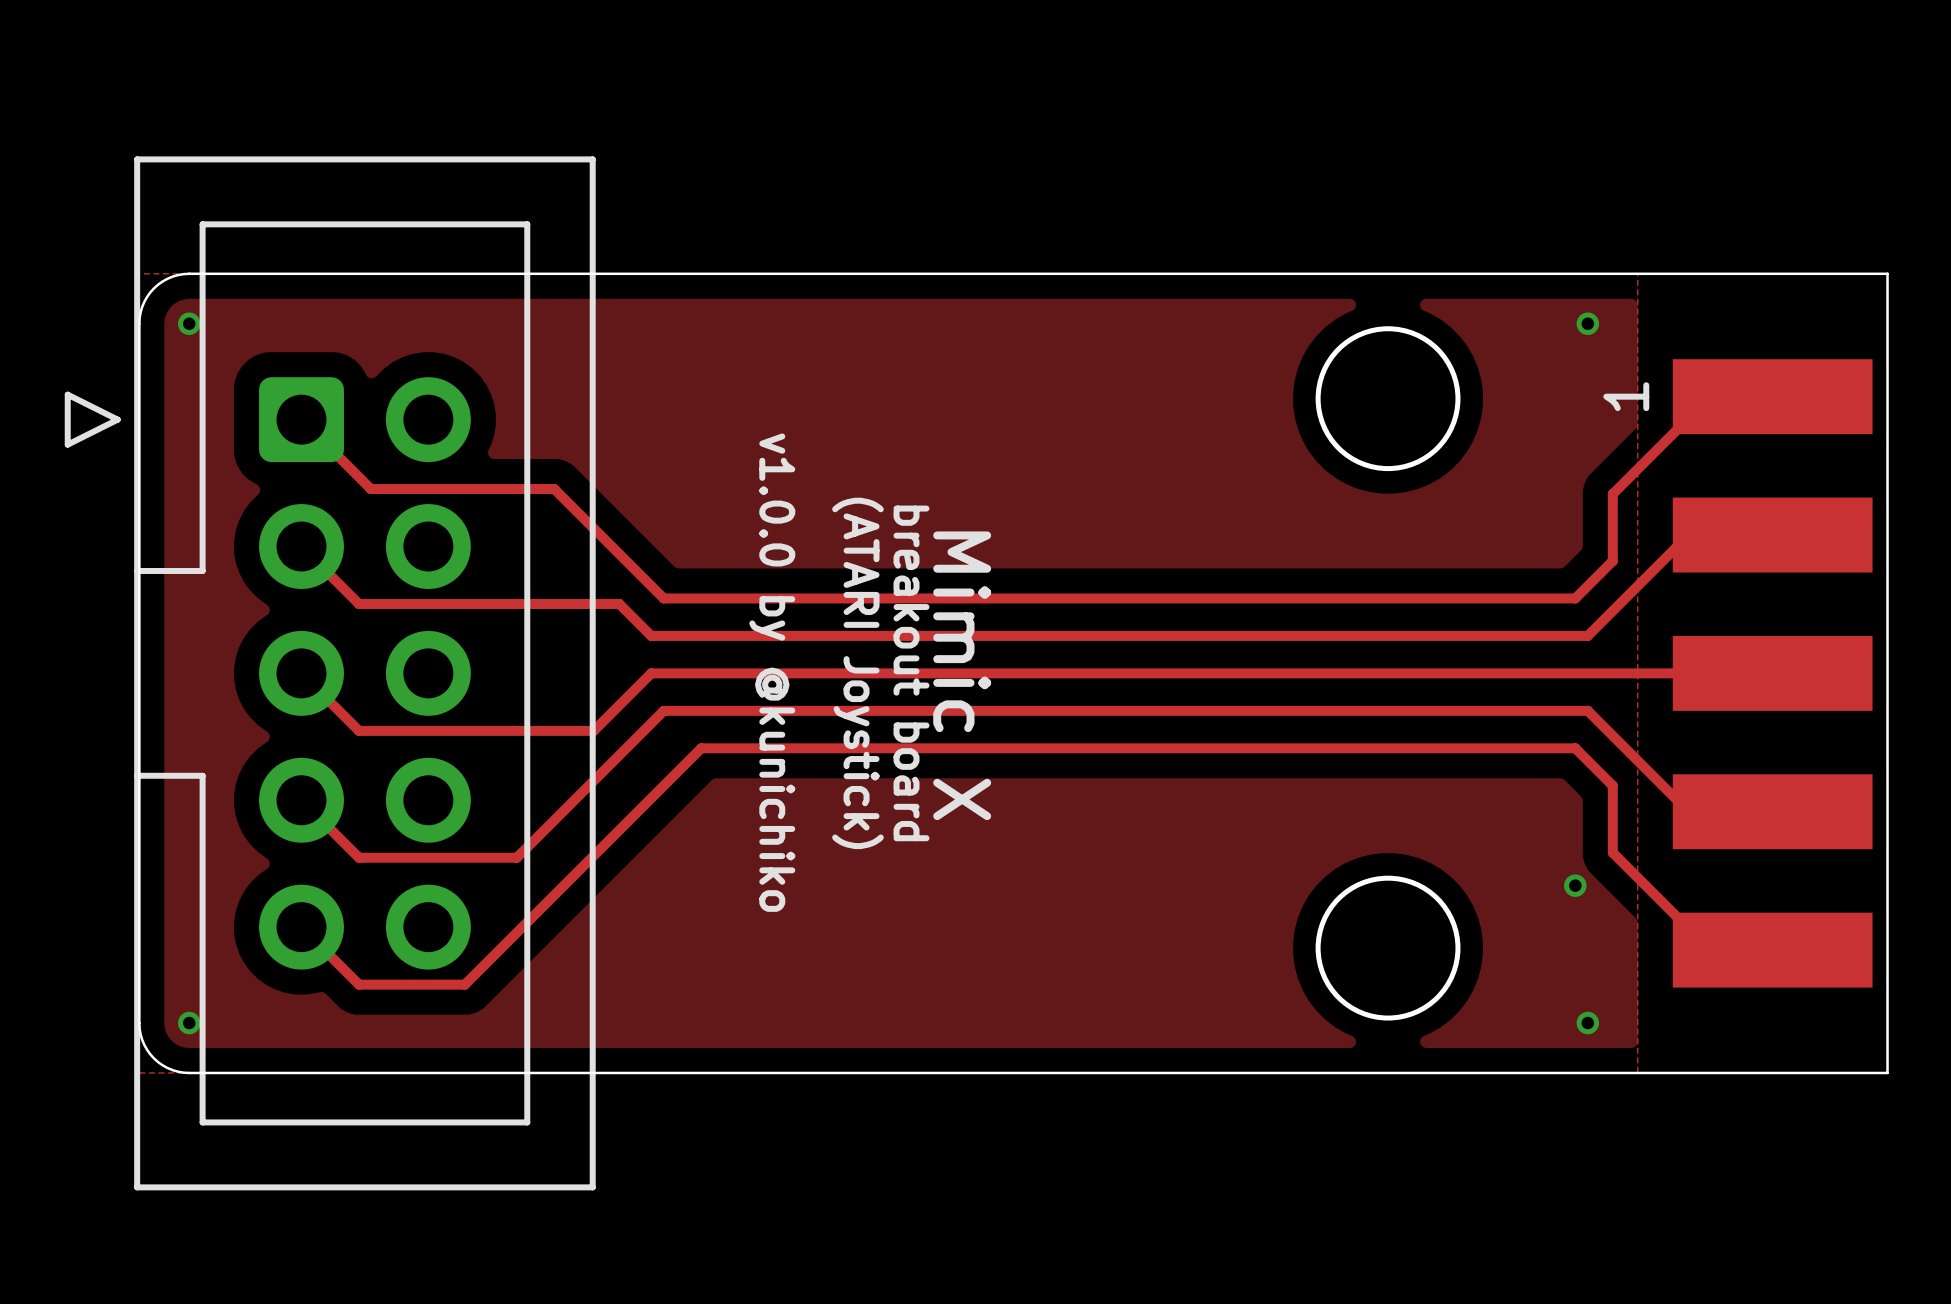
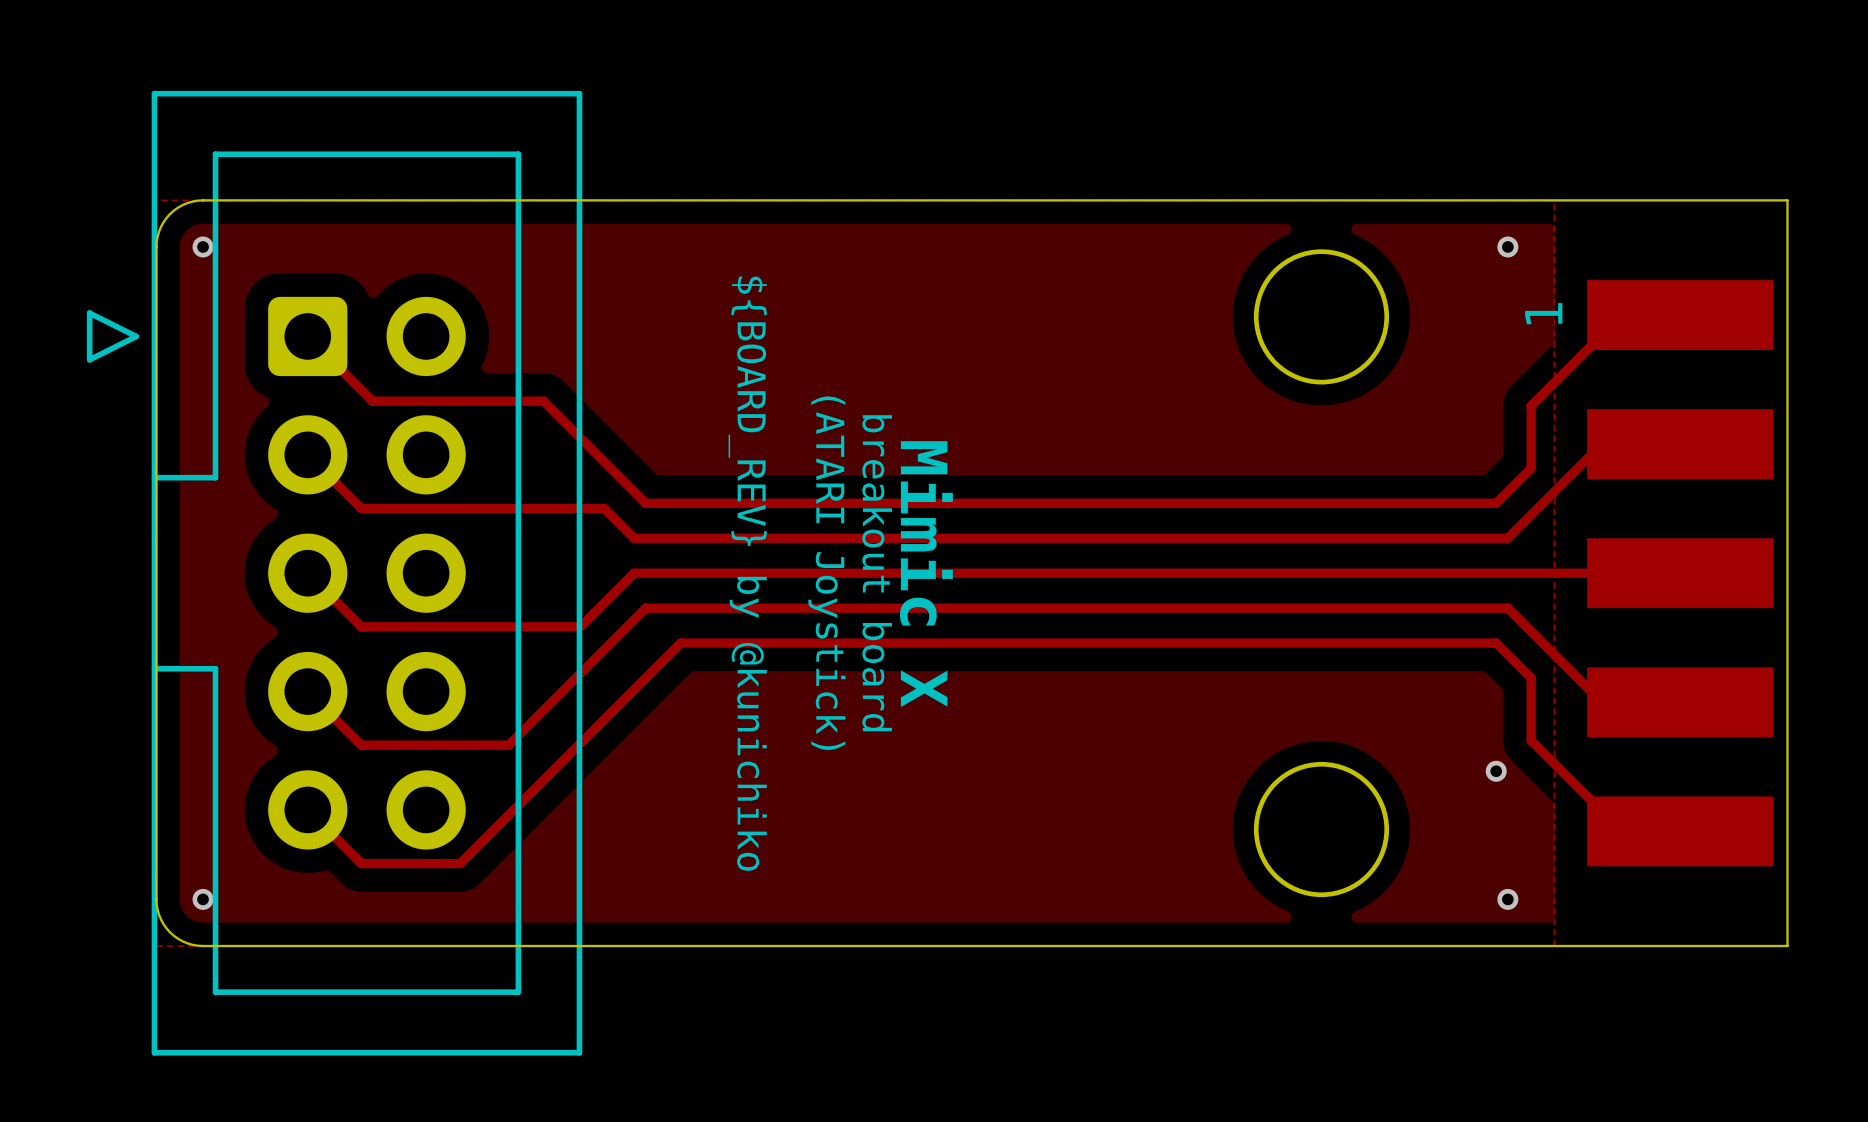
text: v1.0.0 by @kunichiko (772, 672) -> ${BOARD_REV} by @kunichiko (747, 573)

